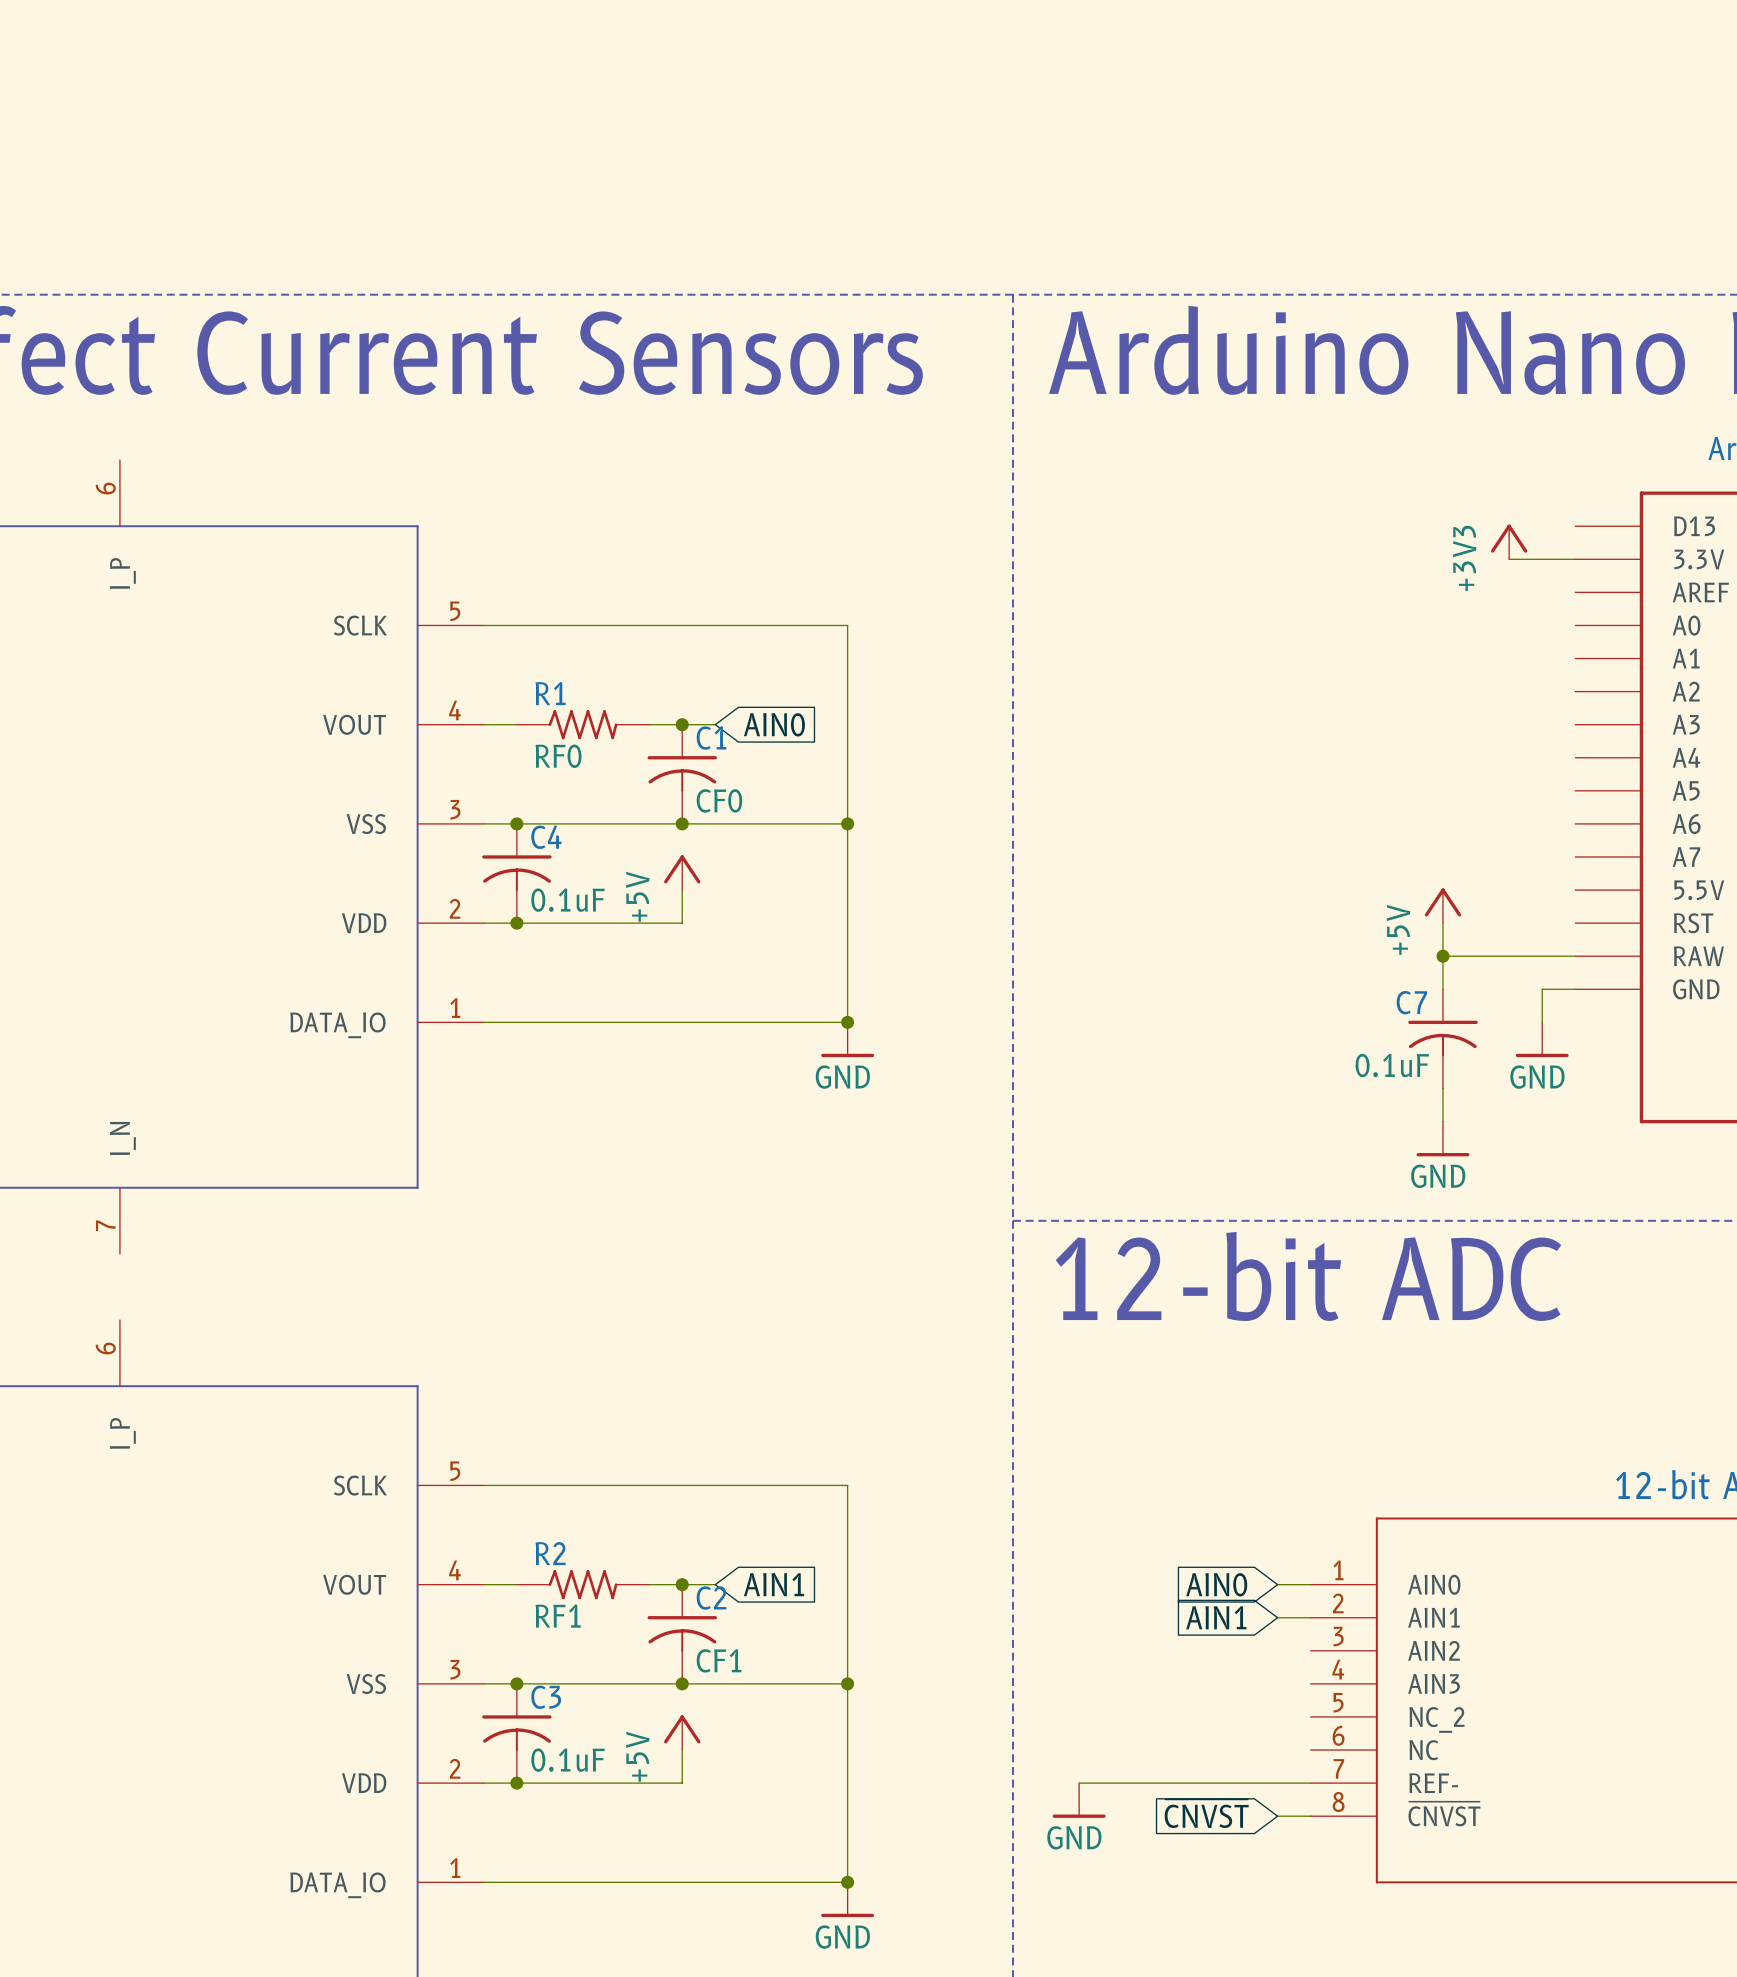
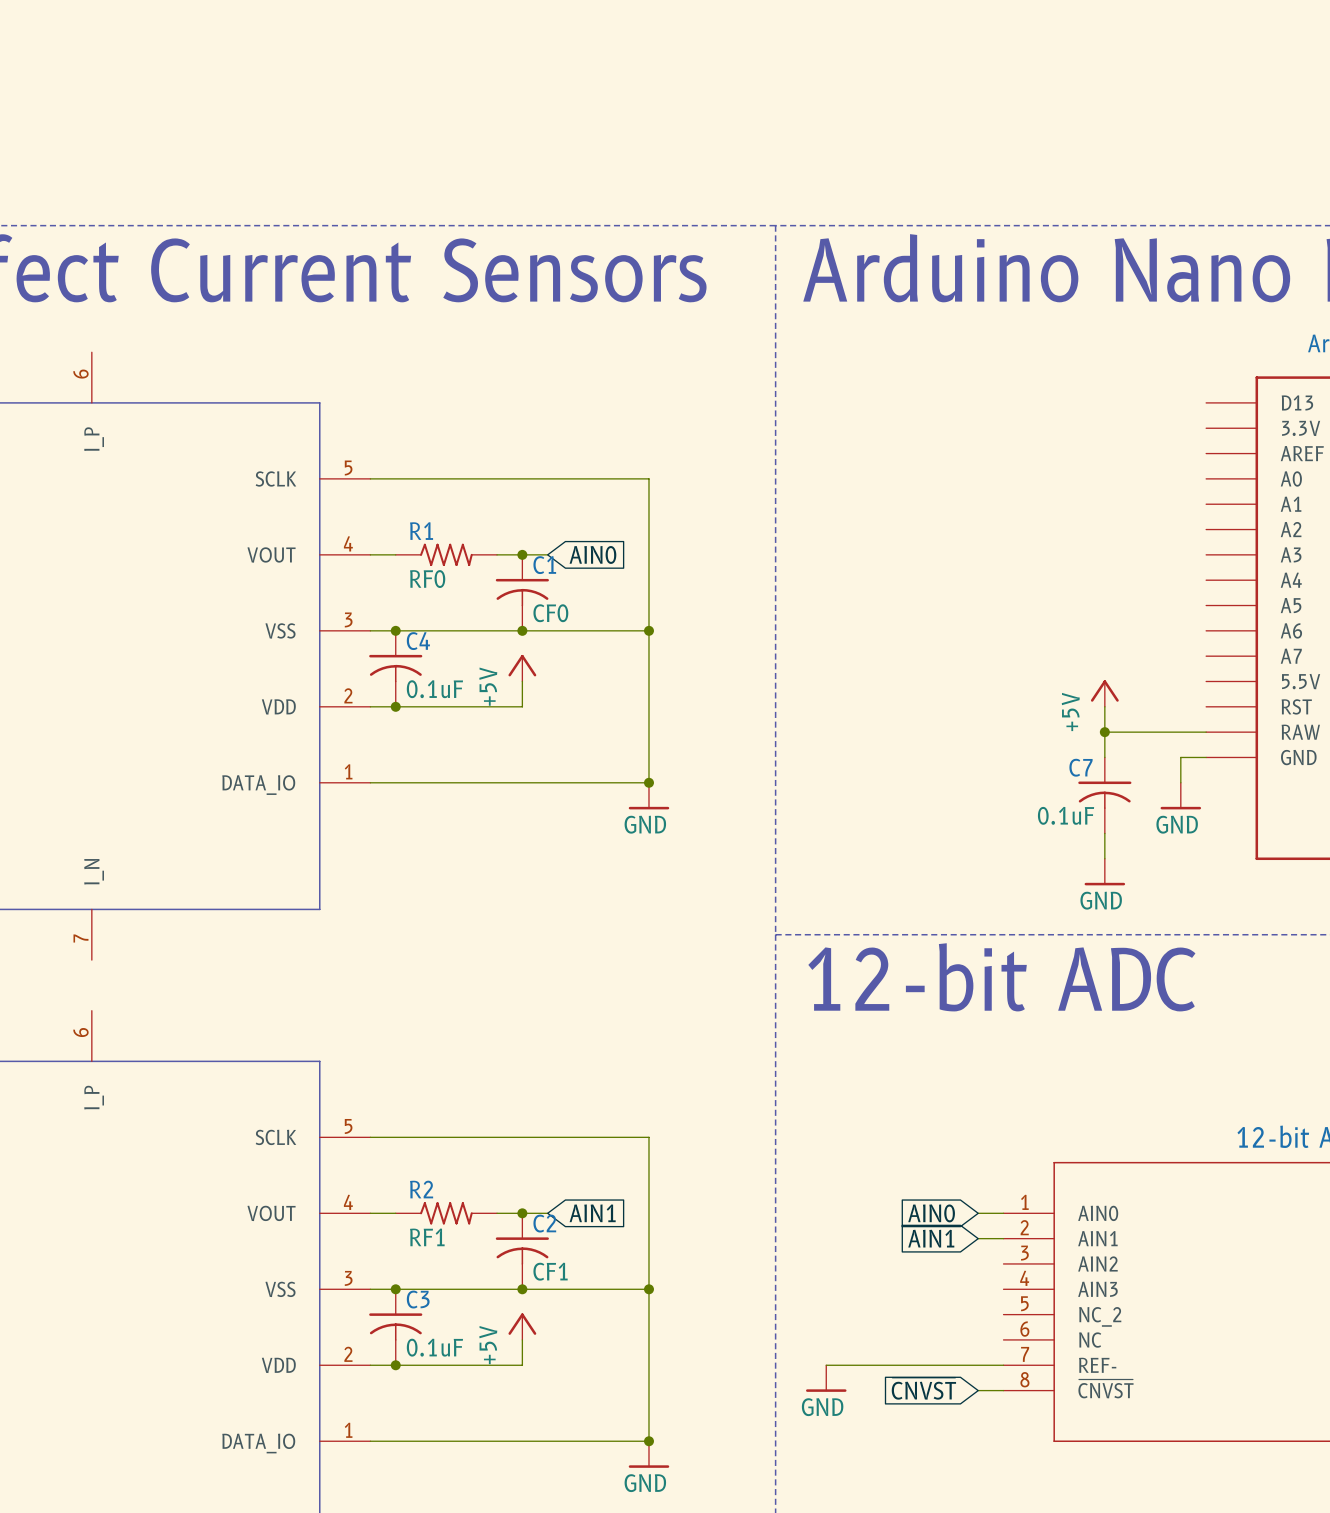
power symbol: +3V3 (1509, 541) -> none
wire: (1509, 559) (1575, 559) -> none

